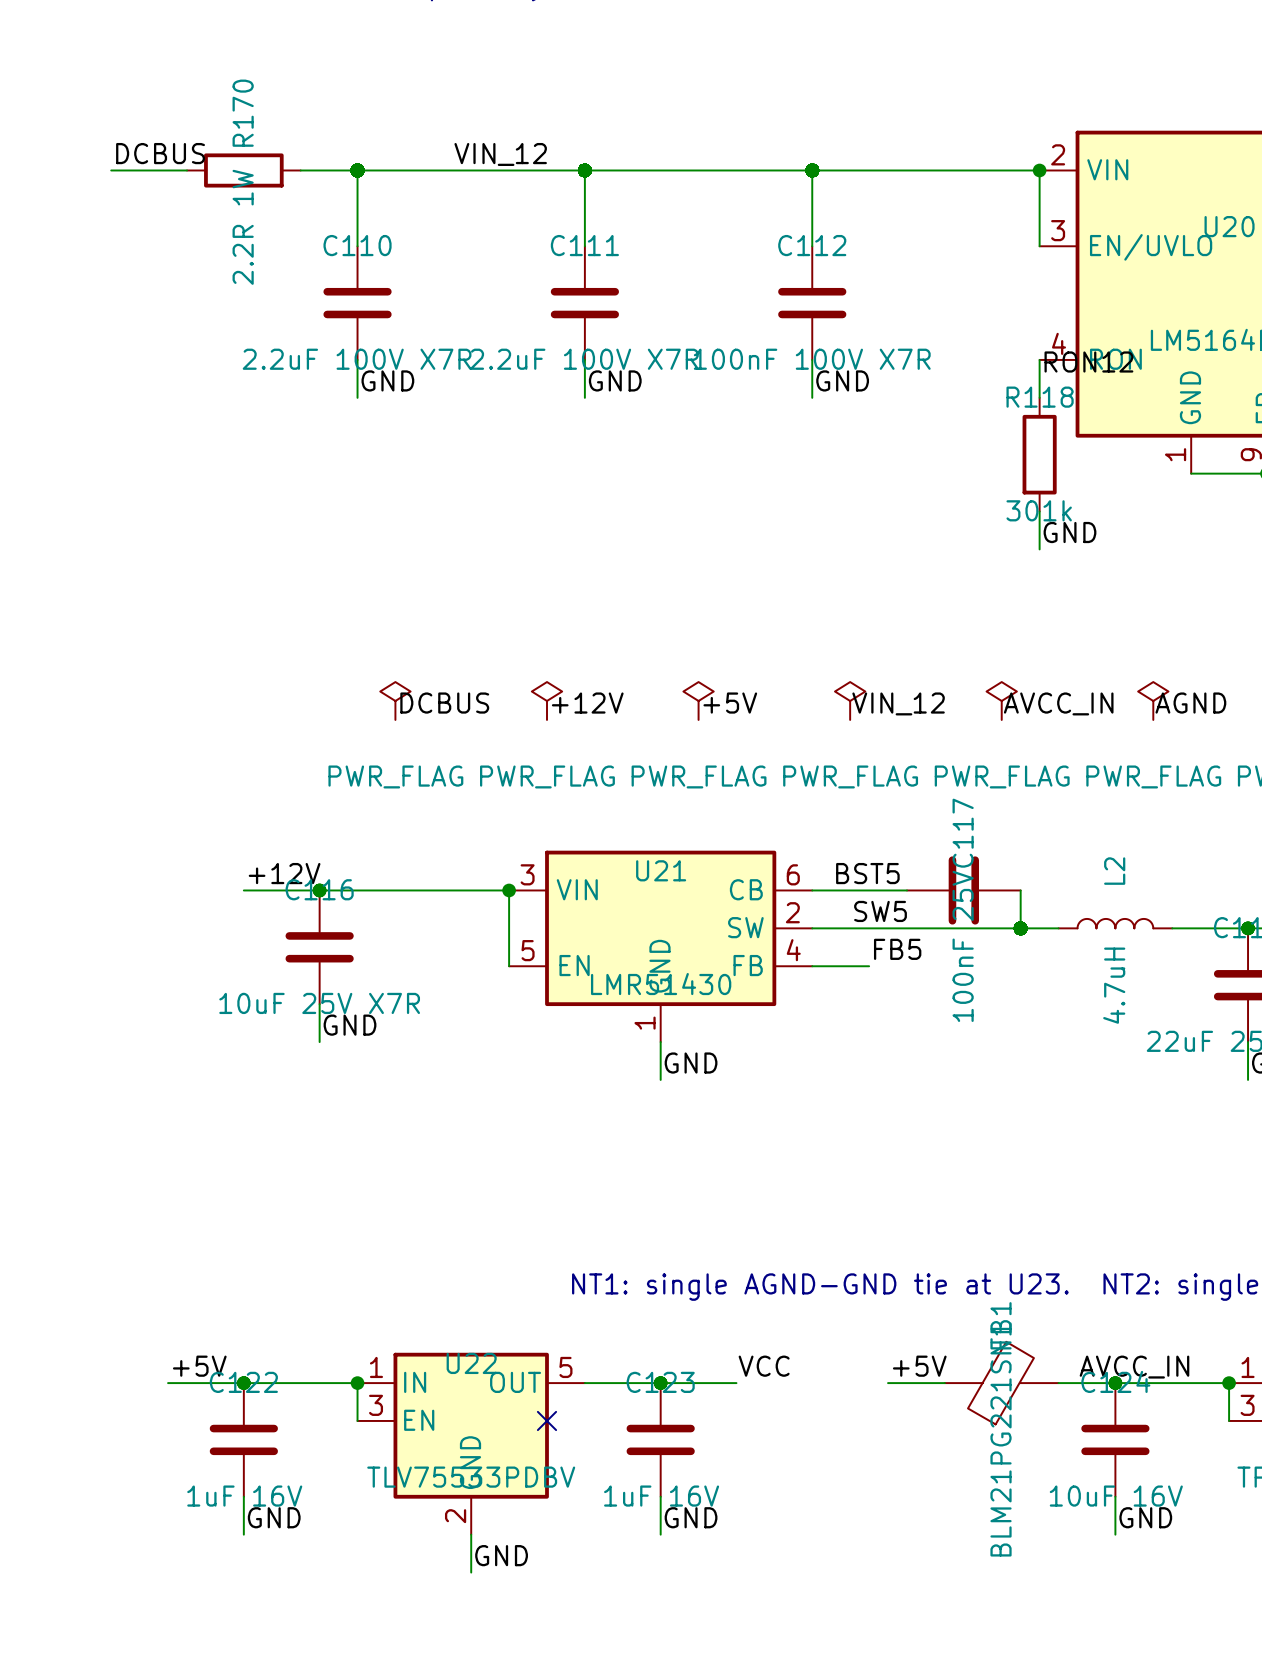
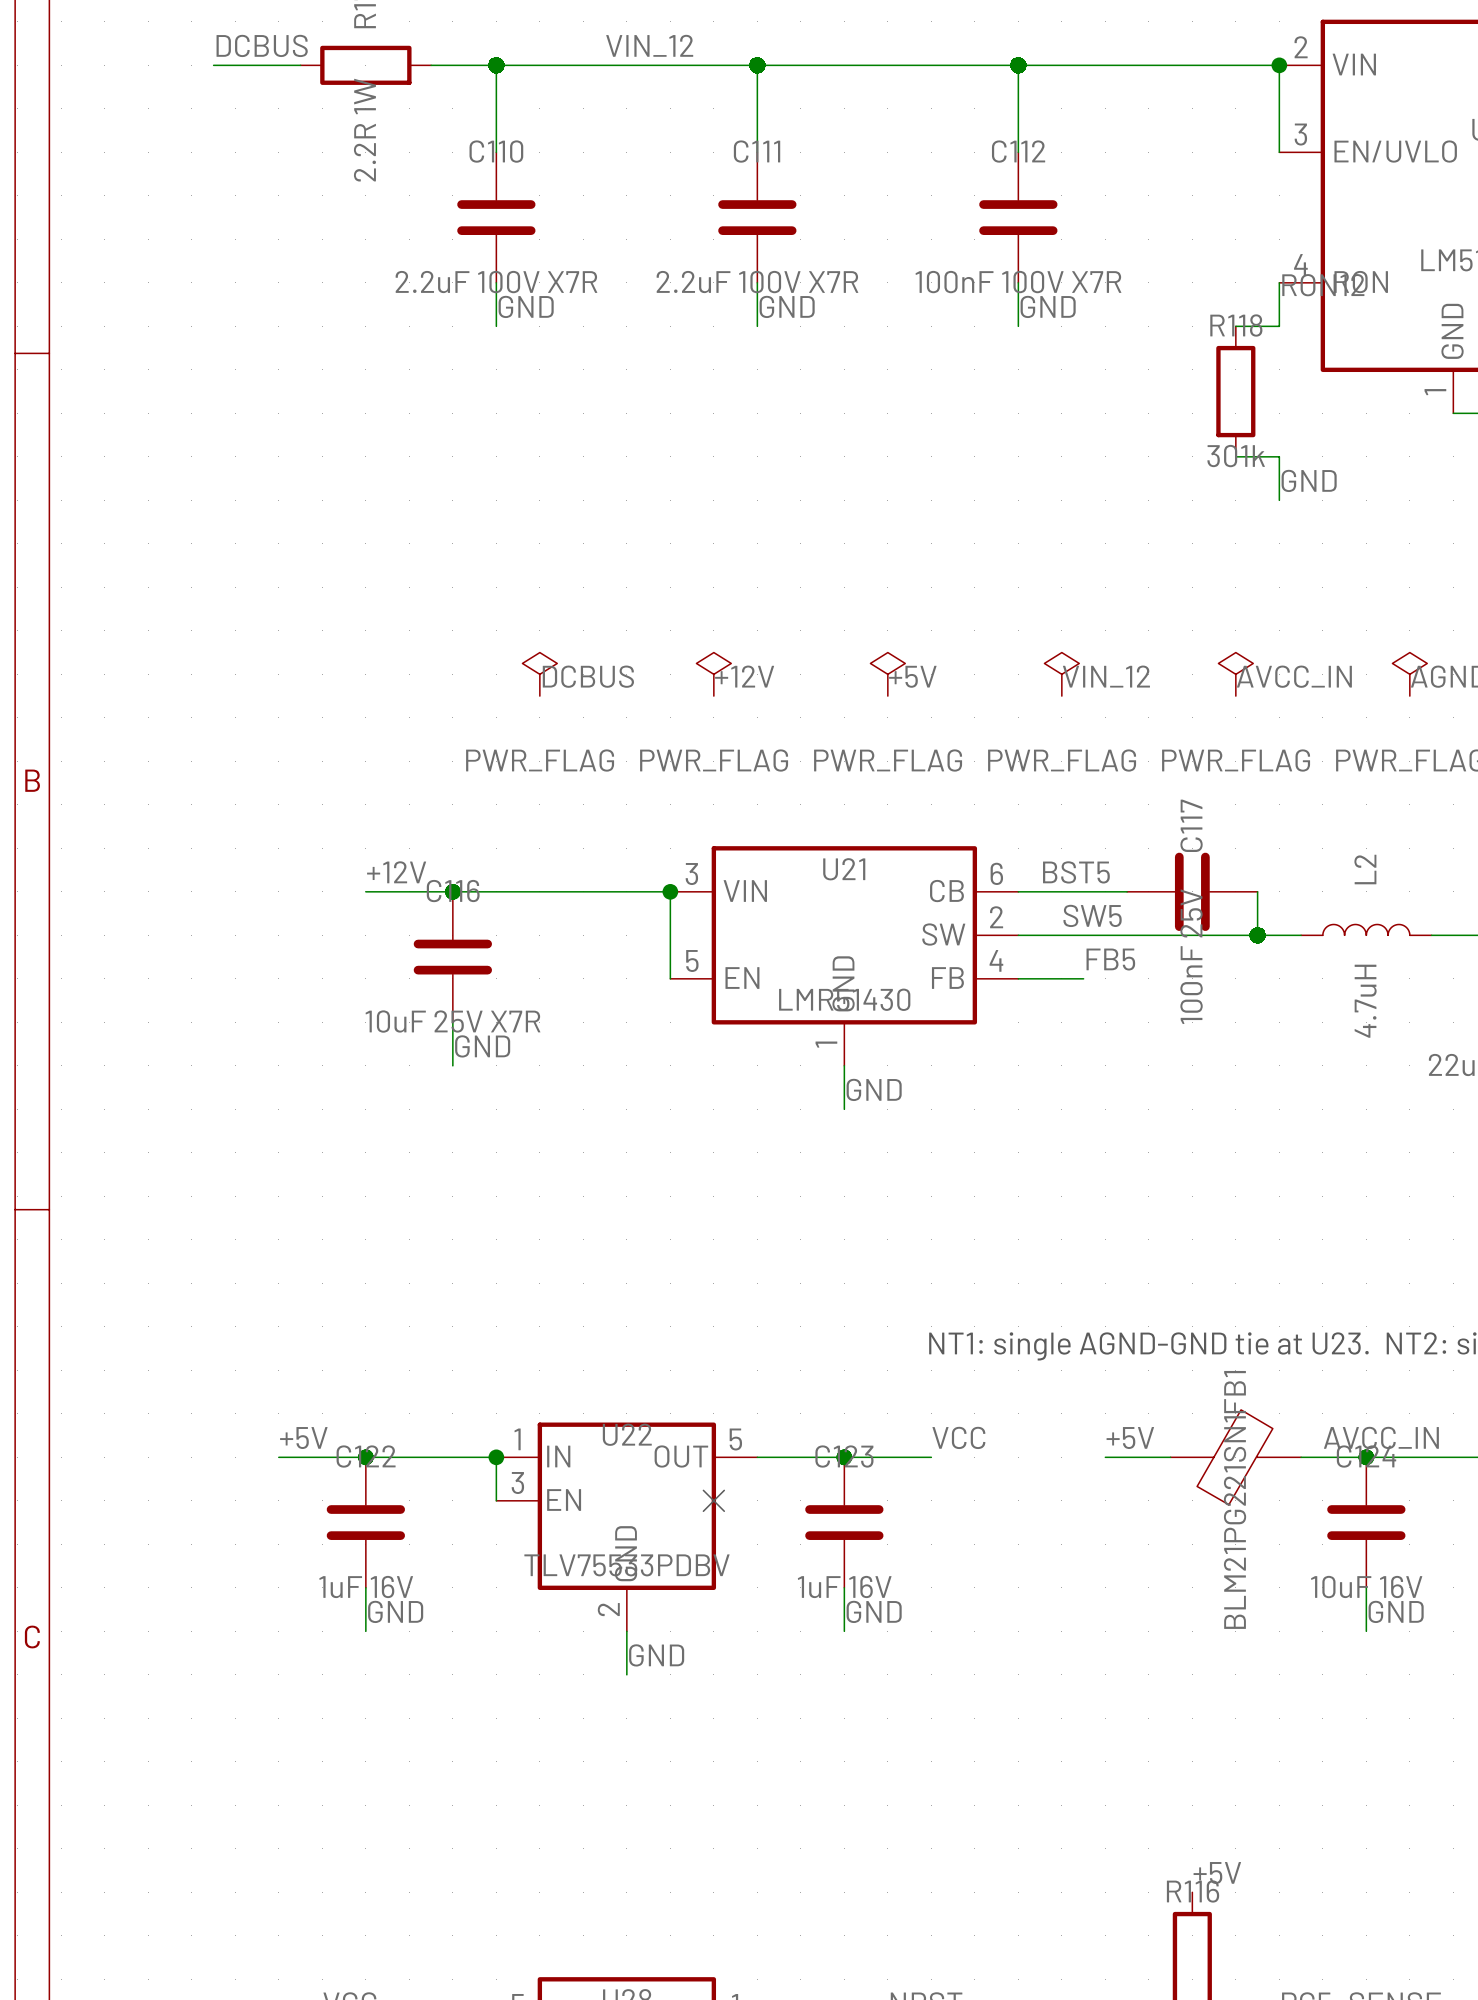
wire: none -> (1235, 326) (1279, 326)
R118 position: (1039, 454) -> (1235, 391)
wire: none -> (1235, 456) (1279, 456)

